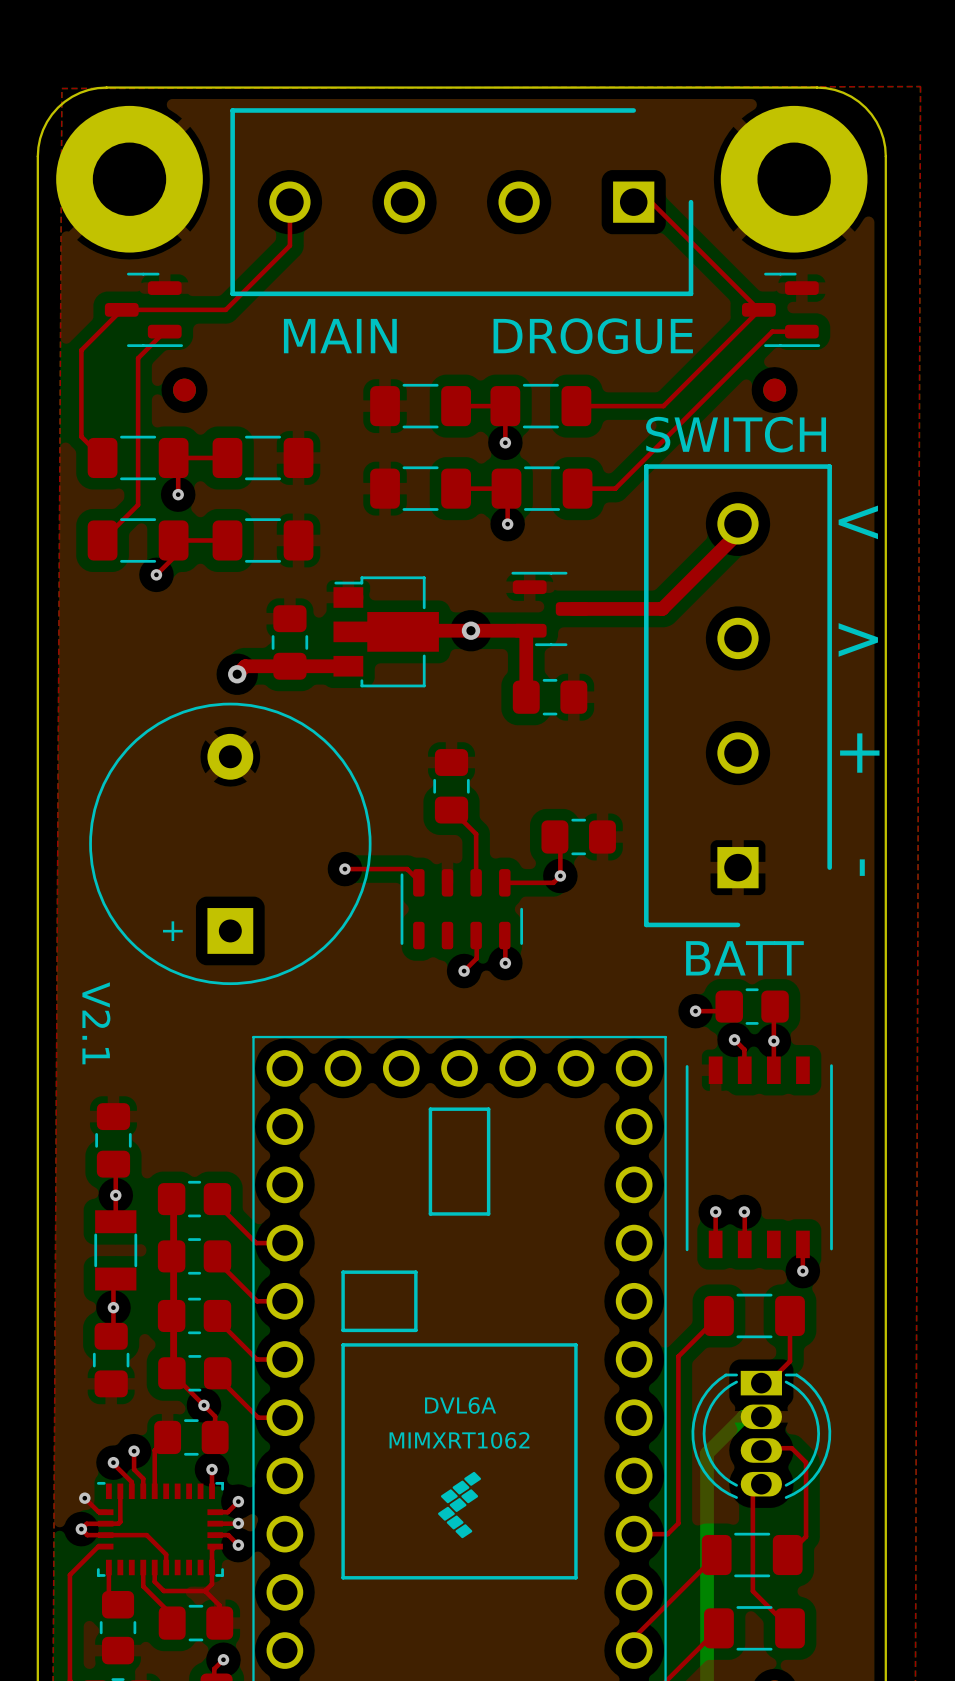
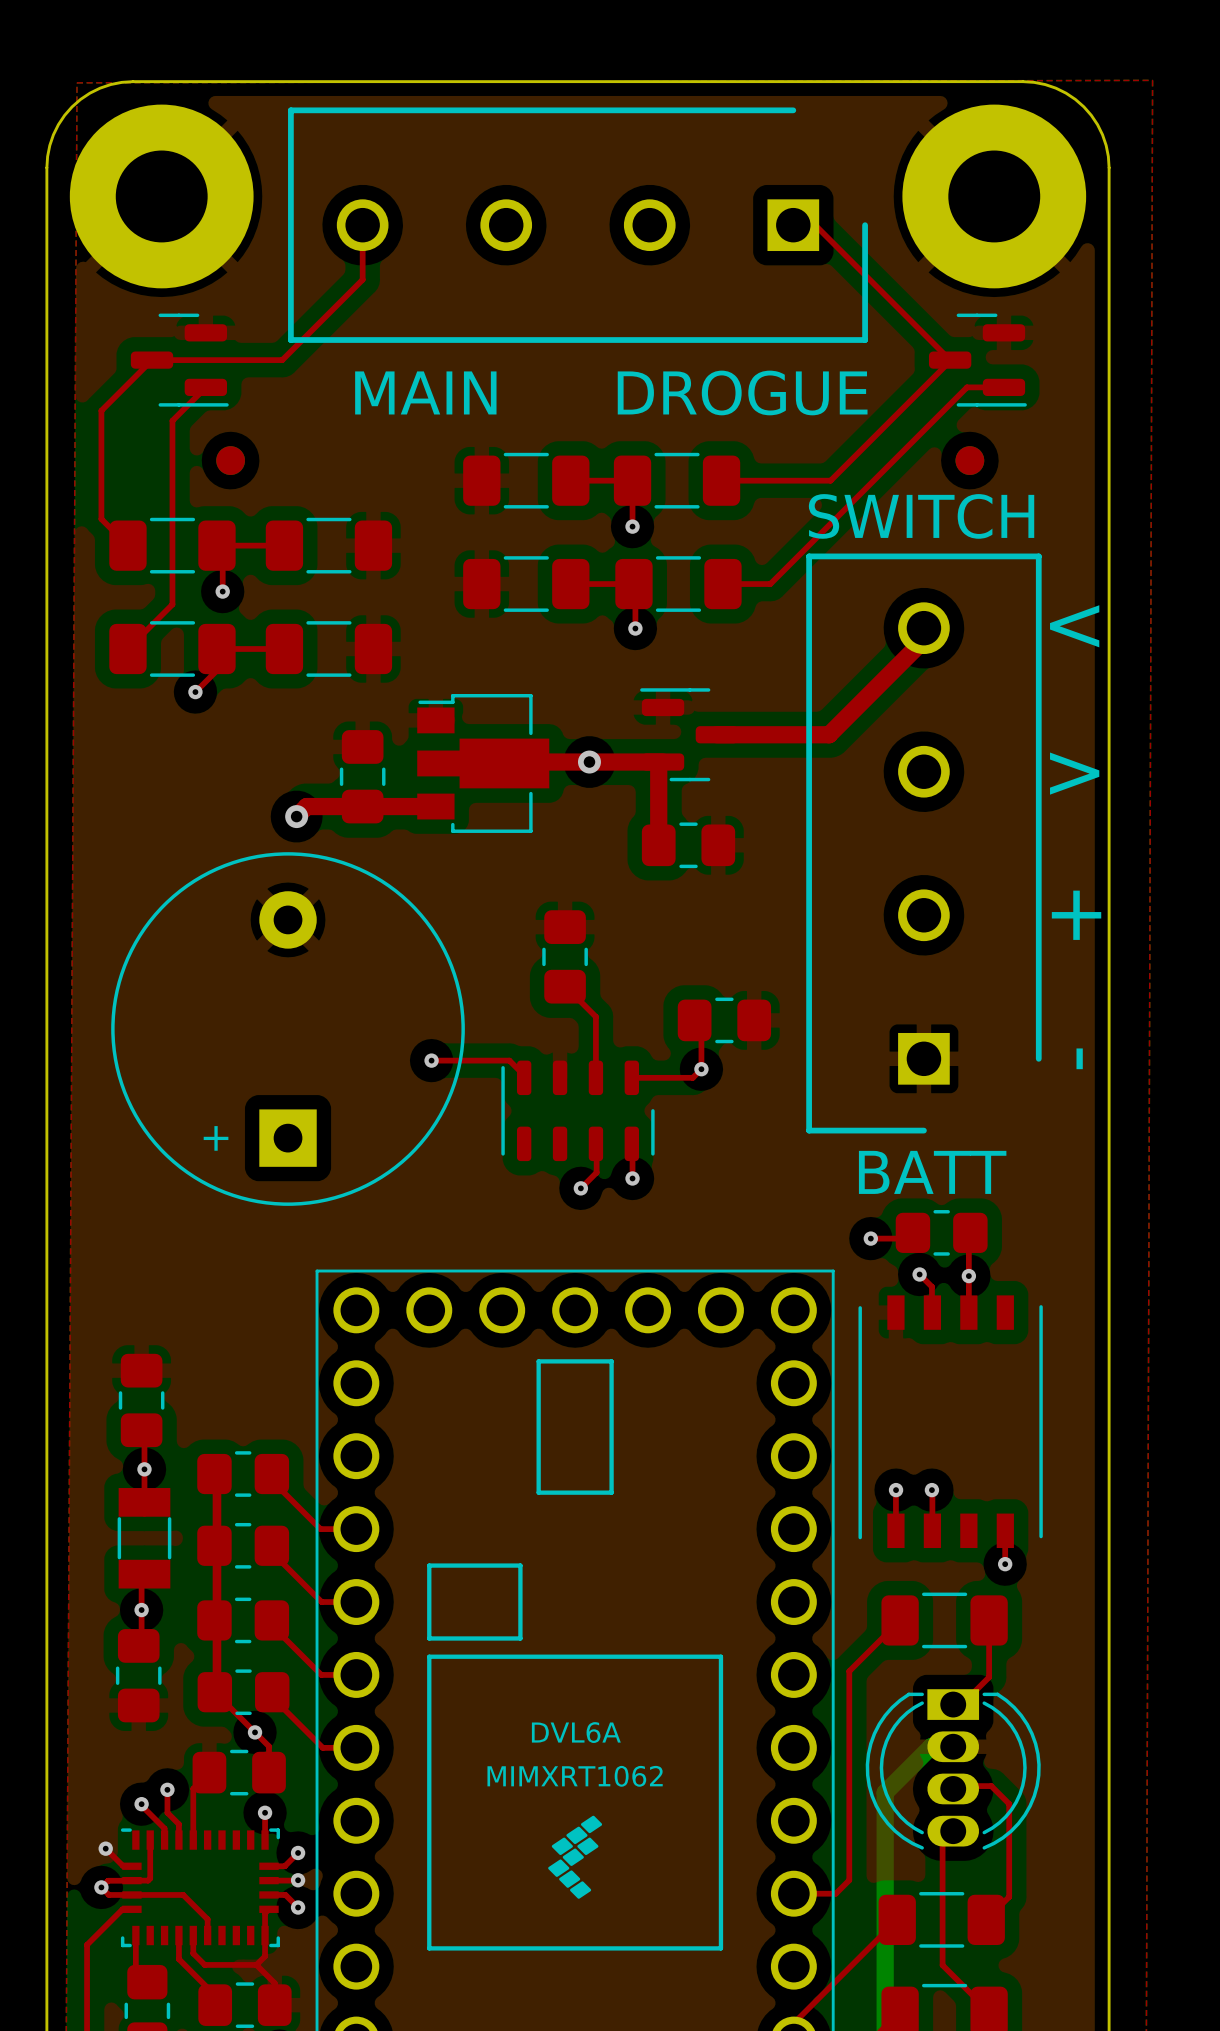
text: V2.1 (96, 1023) -> none

